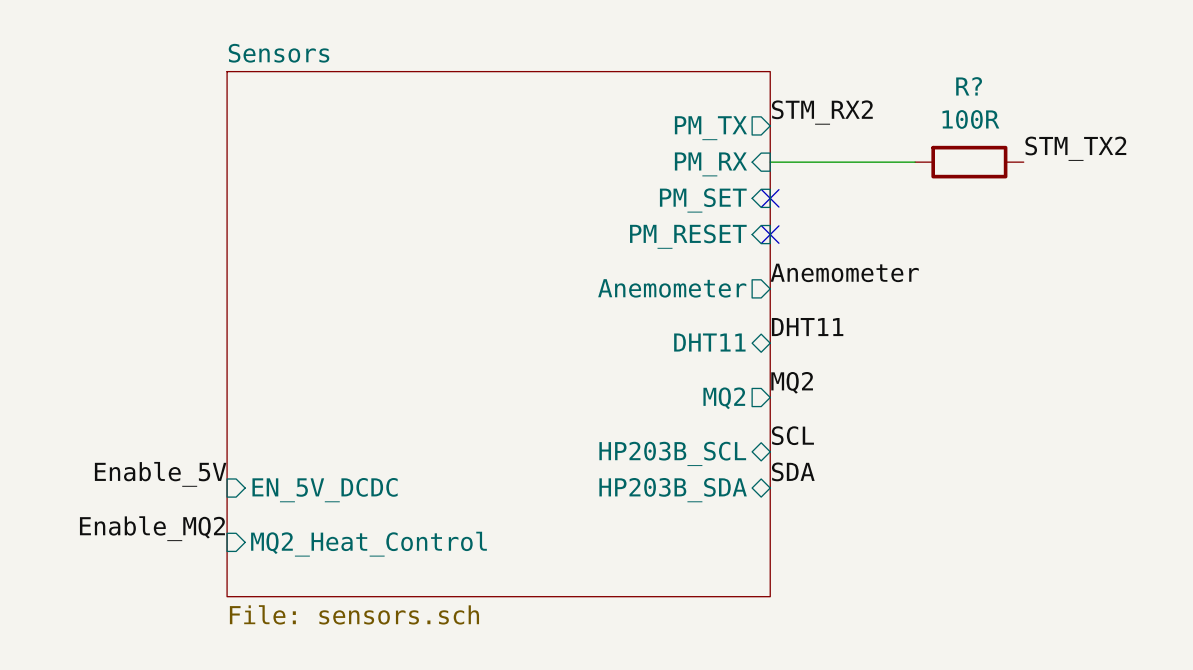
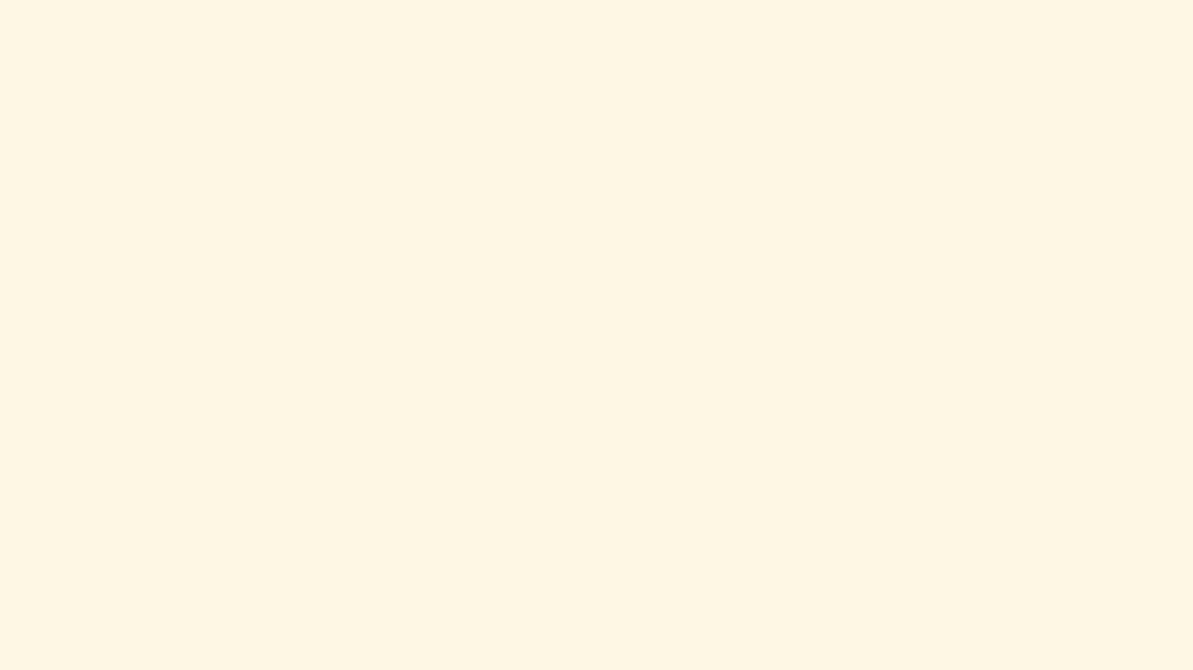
label: STM_RX2 (822, 112) -> none
sheet pin: PM_TX (710, 128) -> none
label: STM_TX2 (1075, 148) -> none
wire: (770, 162) (915, 162) -> none
R?: 100R (969, 162) -> none
sheet pin: PM_RX (710, 164) -> none
no-connect mark: (770, 198) -> none
sheet pin: PM_SET (703, 200) -> none
no-connect mark: (770, 234) -> none
sheet pin: PM_RESET (688, 236) -> none
label: Anemometer (844, 272) -> none
sheet pin: Anemometer (672, 288) -> none
label: DHT11 (807, 327) -> none
sheet Sensors: File: sensors.sch (498, 334) -> none
sheet pin: DHT11 (709, 342) -> none
label: MQ2 (792, 382) -> none
sheet pin: MQ2 (724, 398) -> none
label: SCL (792, 435) -> none
sheet pin: HP203B_SCL (672, 453) -> none
label: SDA (793, 471) -> none
label: Enable_5V (160, 474) -> none
sheet pin: EN_5V_DCDC (325, 490) -> none
sheet pin: HP203B_SDA (673, 490) -> none
label: Enable_MQ2 (152, 528) -> none
sheet pin: MQ2_Heat_Control (368, 544) -> none

